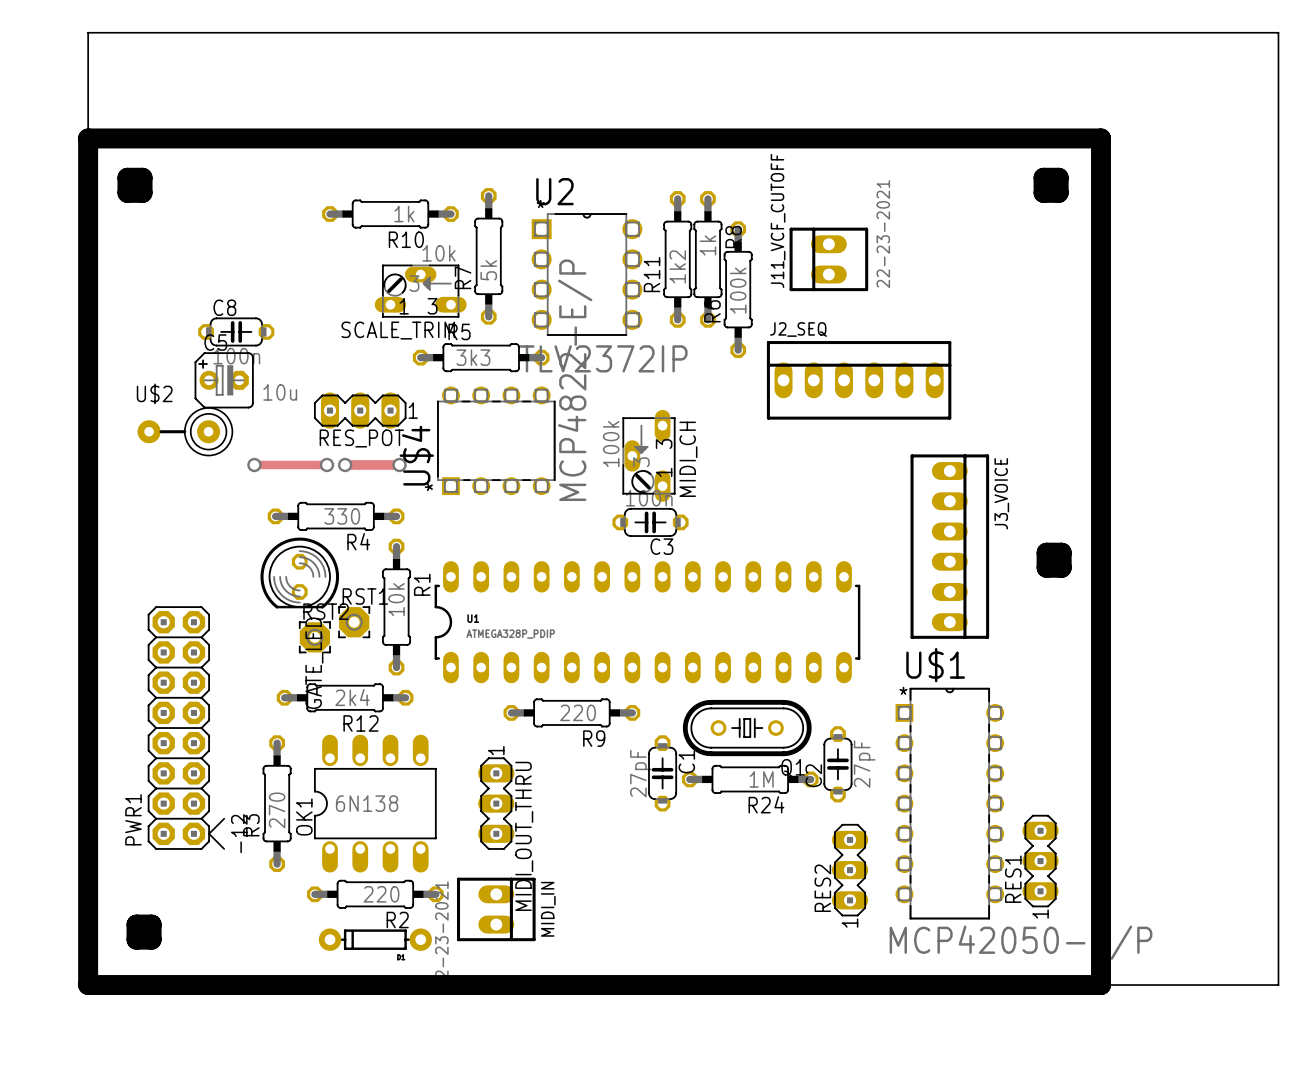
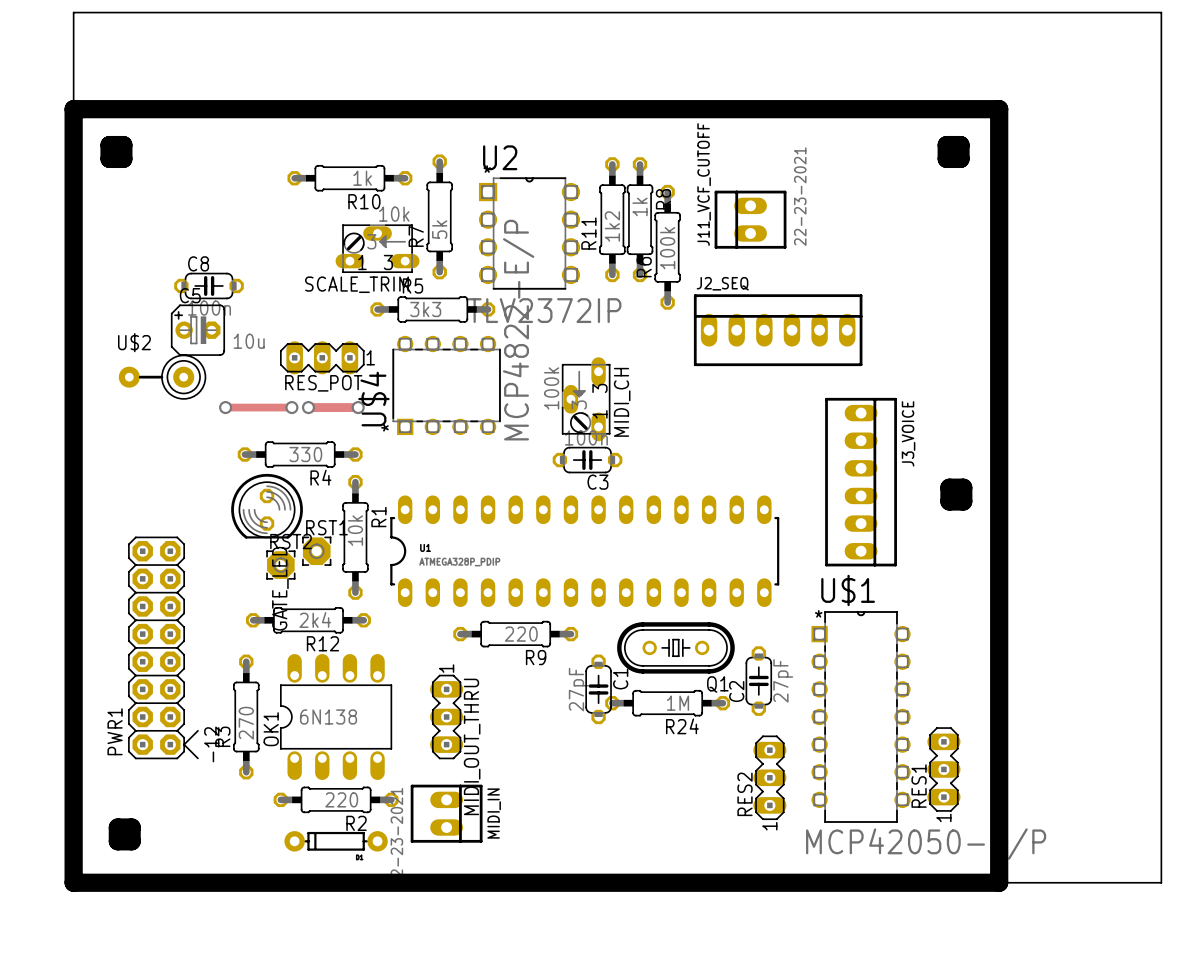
R24 position: (750, 779) -> (667, 703)

